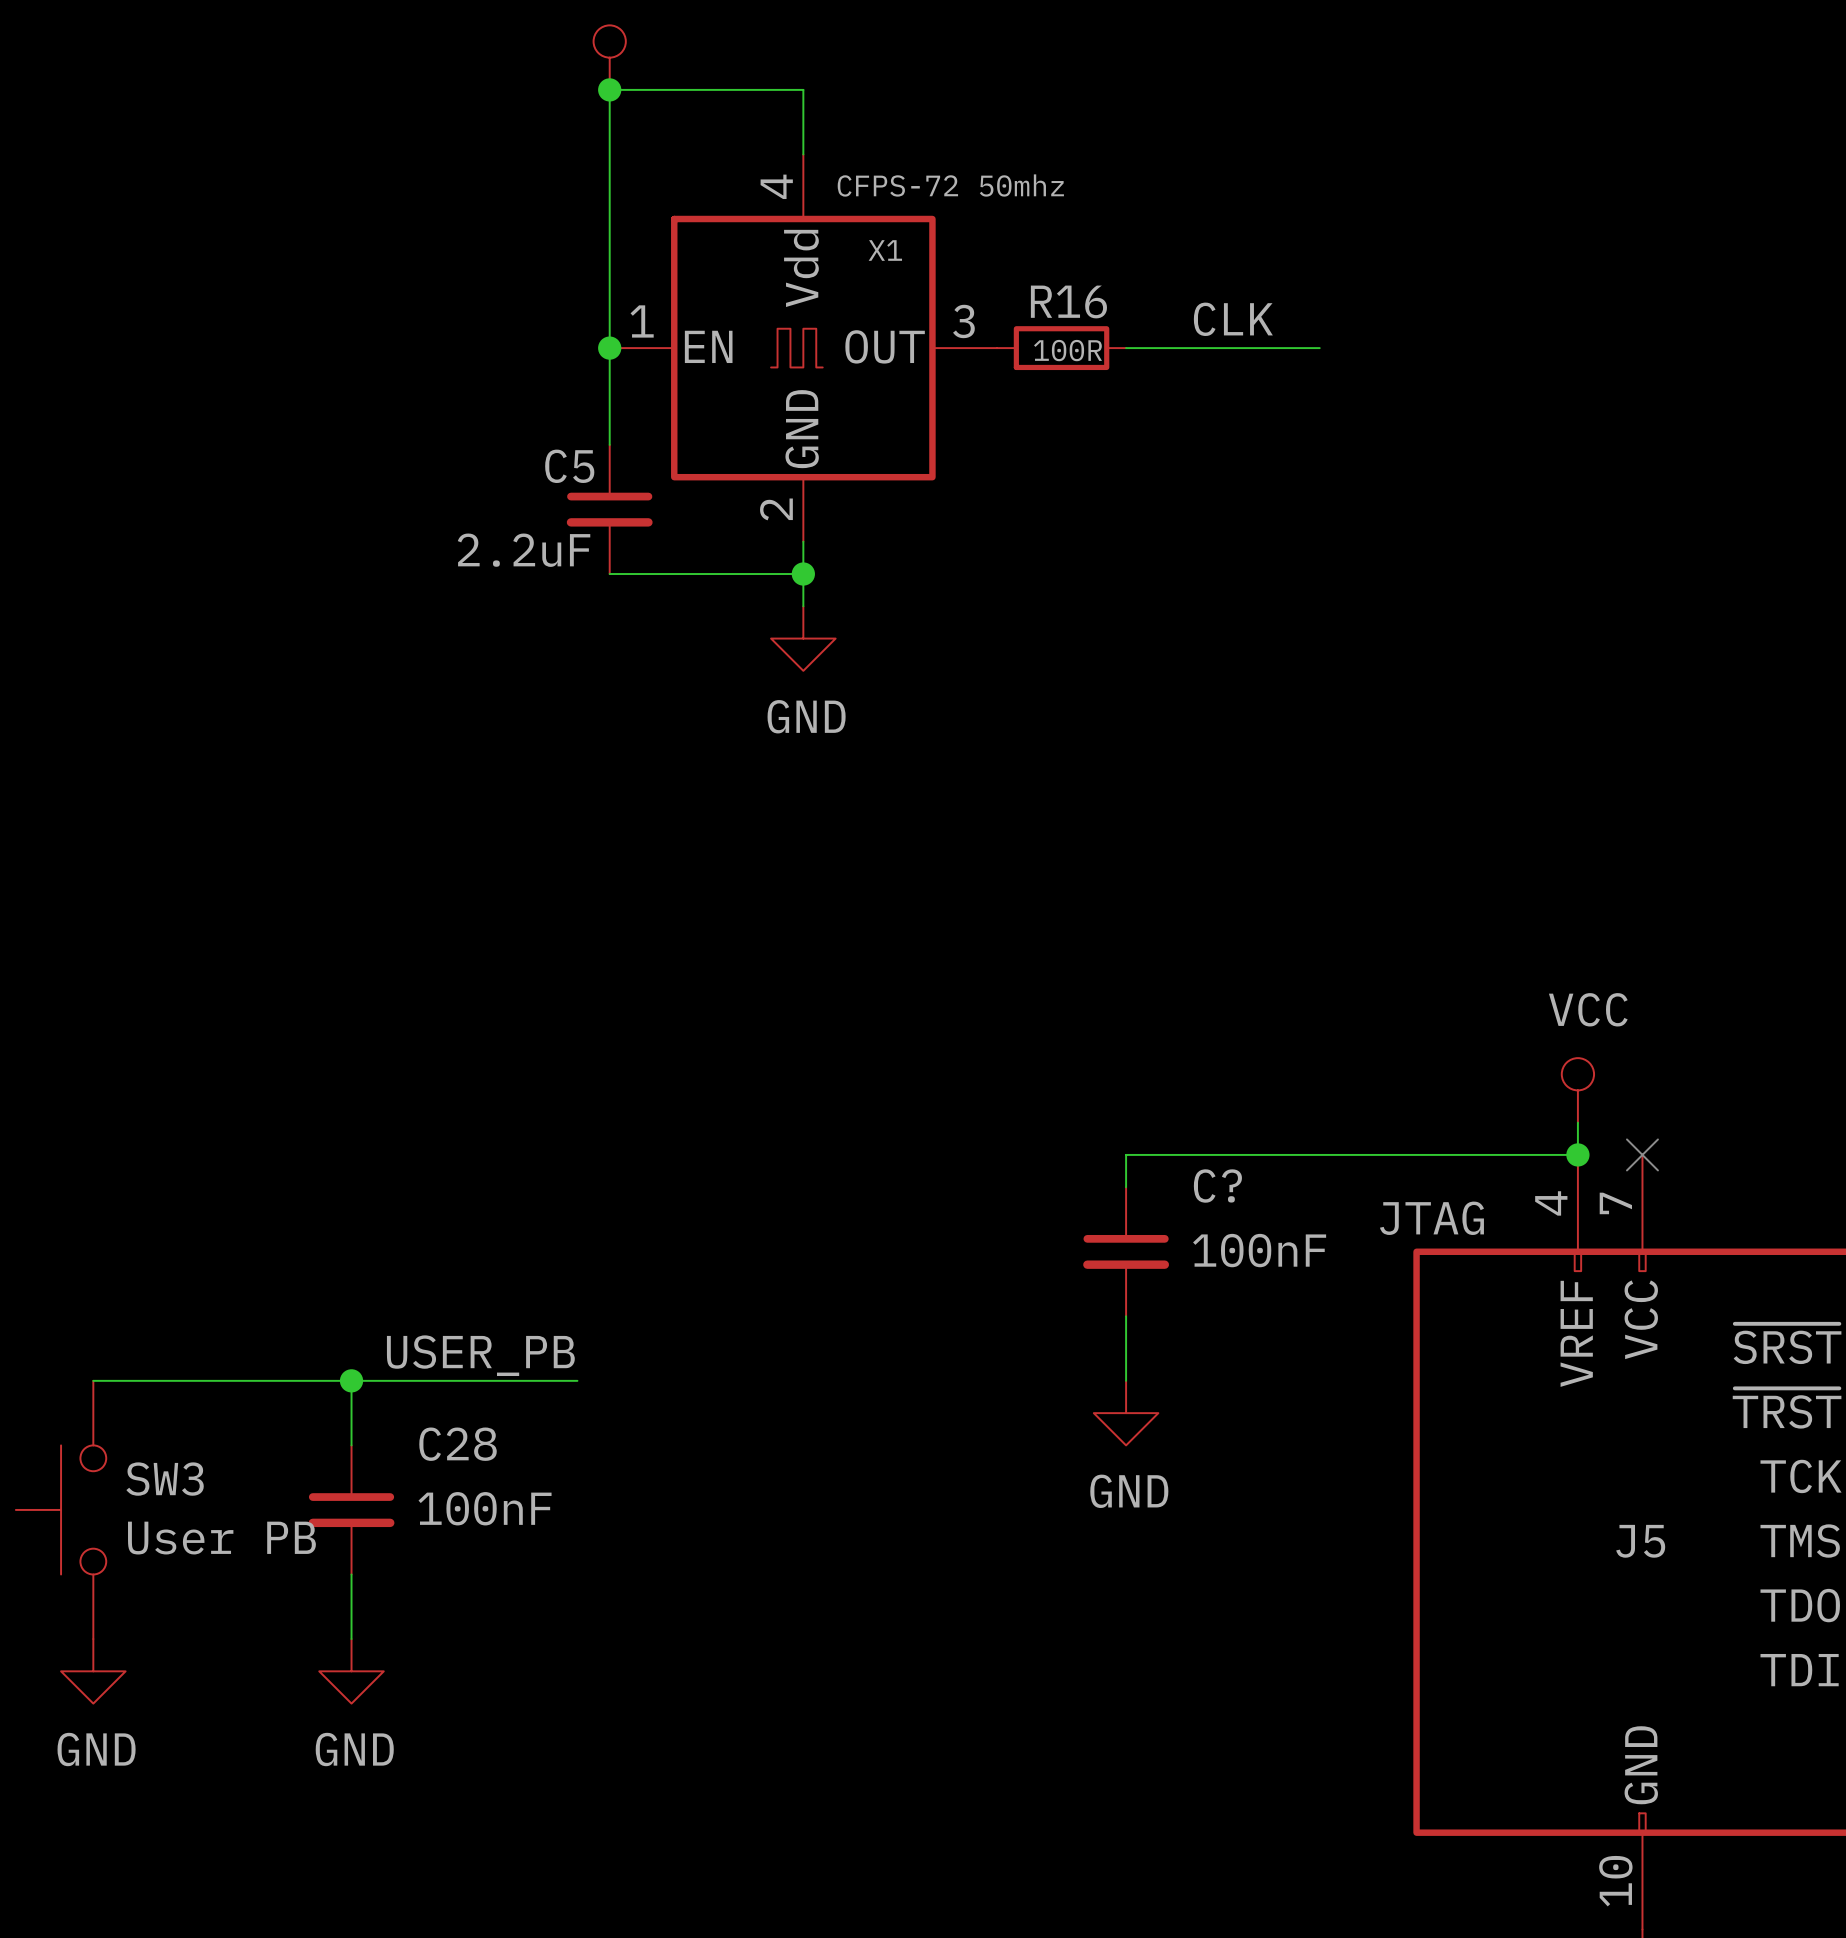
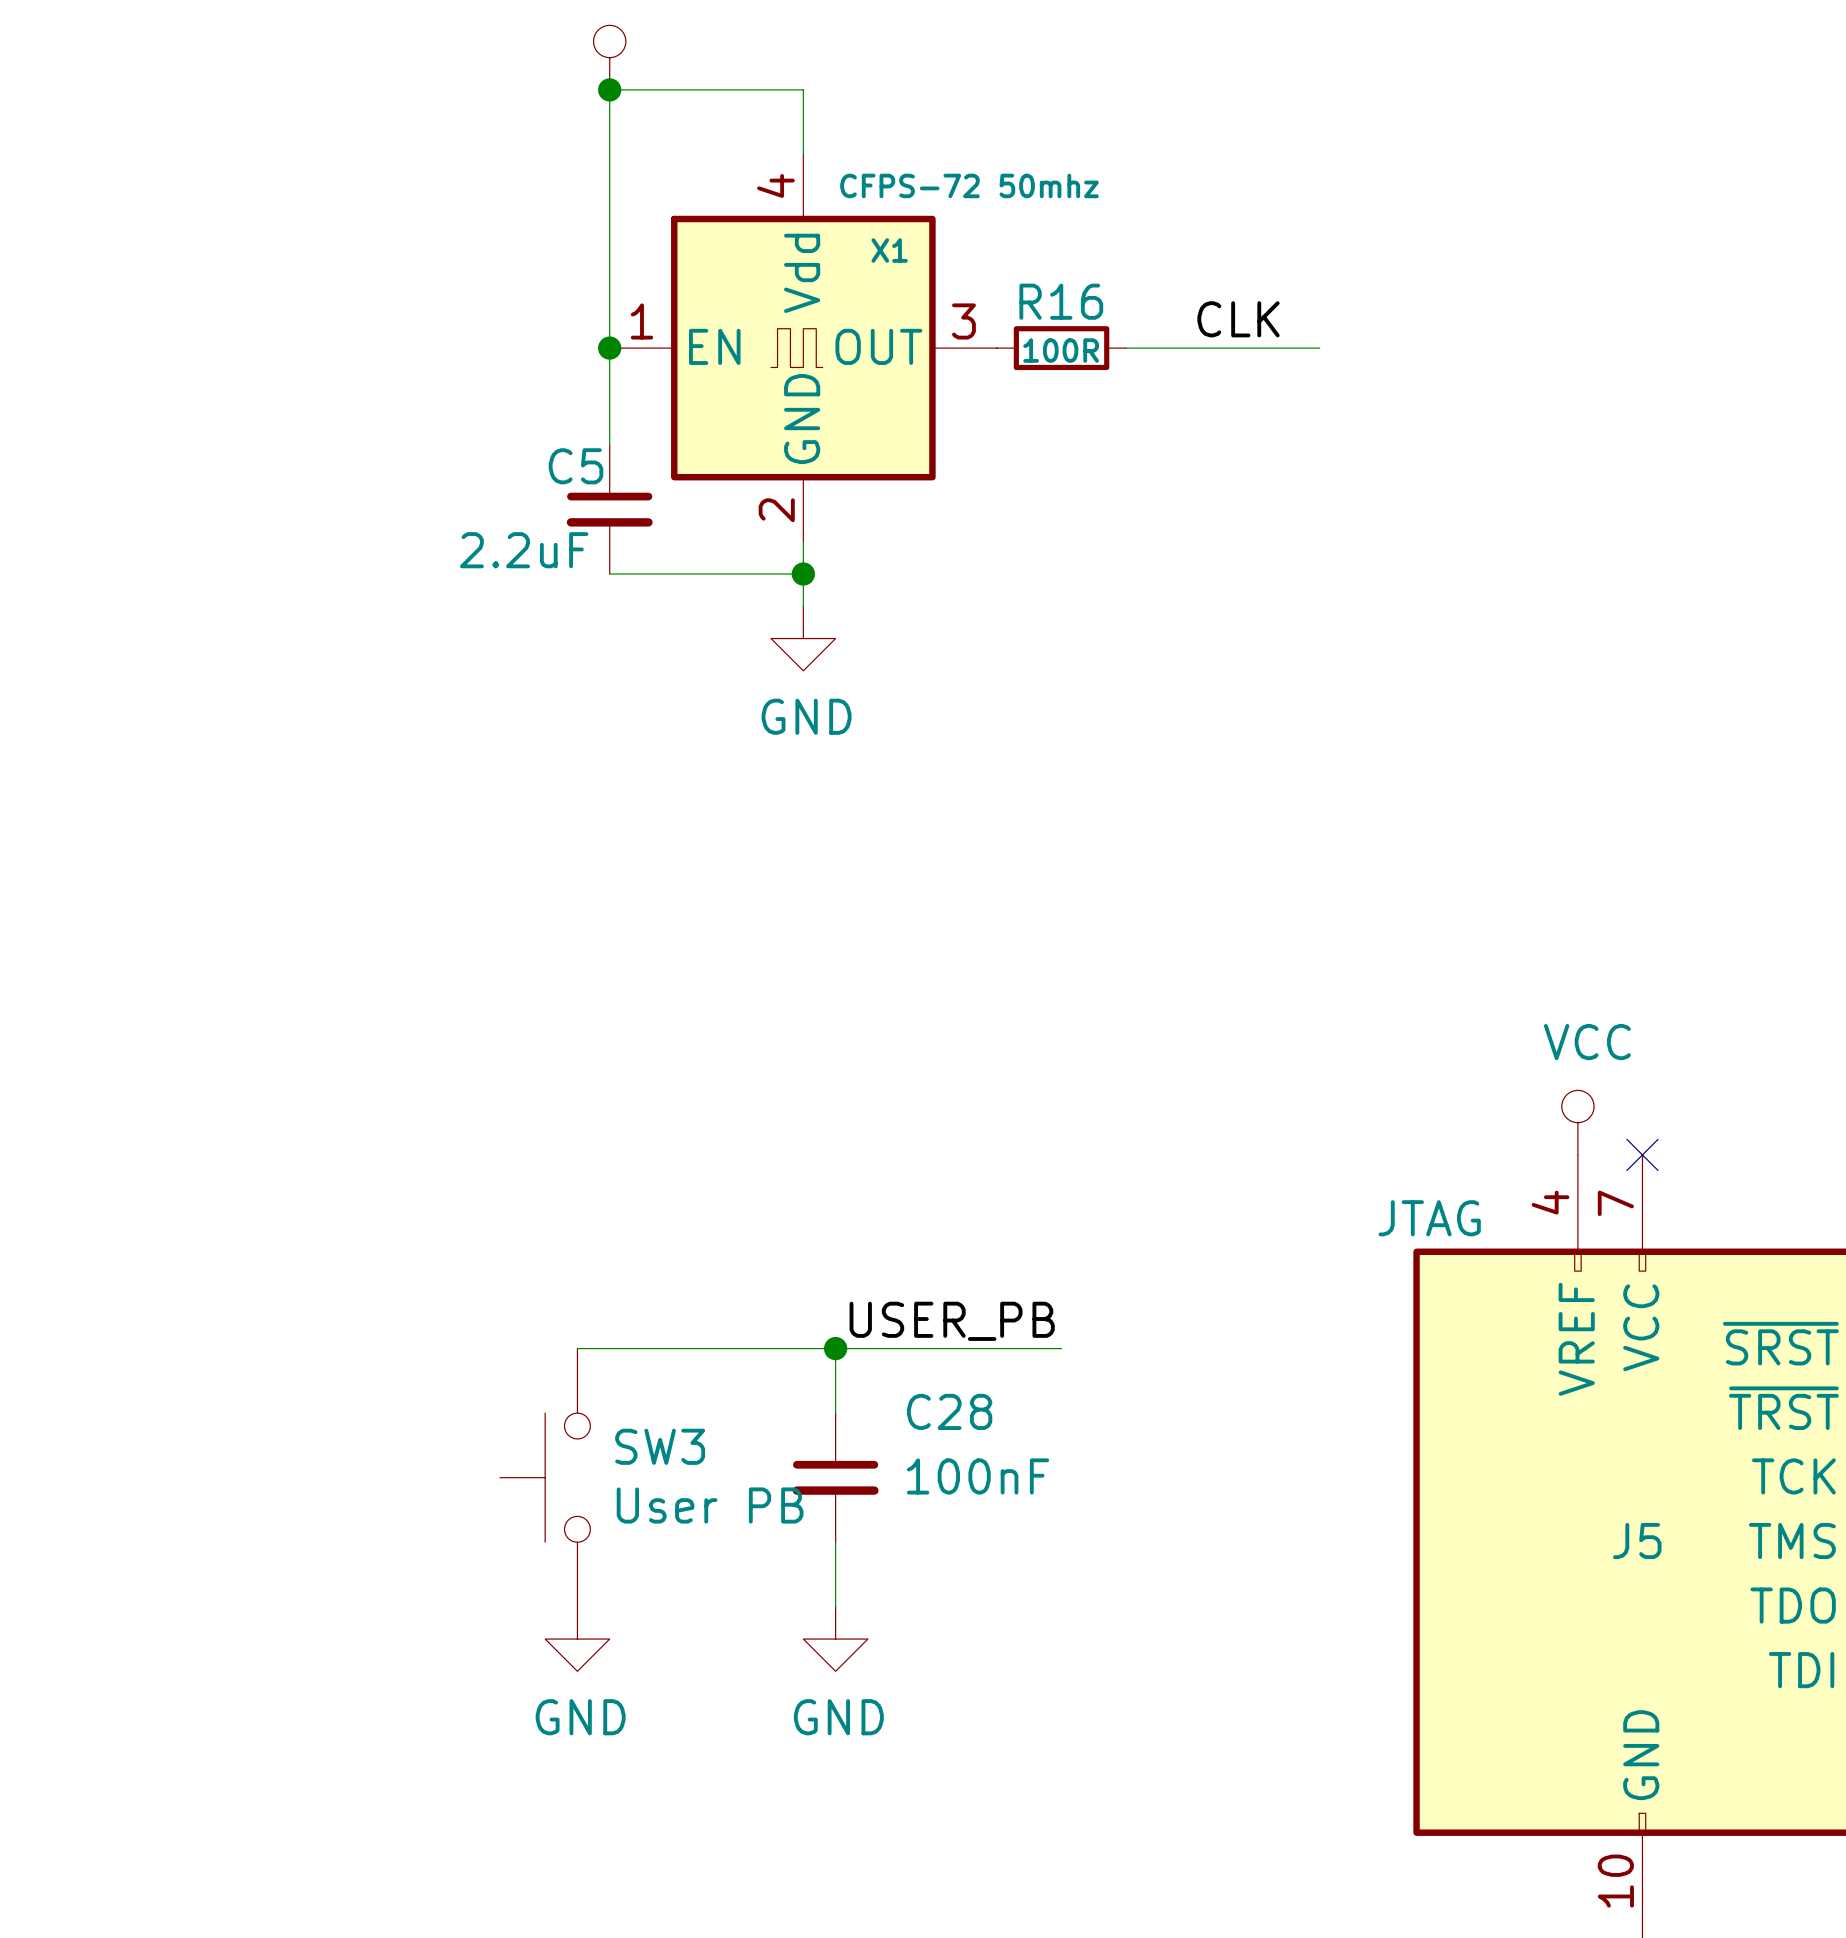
power symbol position: VCC (1577, 1090) -> VCC (1577, 1122)
wire: (1577, 1122) (1577, 1154) (1126, 1154) (1126, 1187) -> none
junction: (1577, 1154) -> none
C?: 100nF (1126, 1251) -> none
wire: (1126, 1316) (1126, 1380) -> none
junction: none -> (835, 1348)
label position: USER_PB (480, 1355) -> USER_PB (952, 1321)
wire: (93, 1380) (577, 1380) -> (577, 1348) (1061, 1348)
wire: (351, 1380) (351, 1445) -> (835, 1348) (835, 1413)
junction: (351, 1380) -> none
power symbol: GND (1126, 1413) -> none
SW3 position: (61, 1509) -> (545, 1477)
C28 position: (351, 1509) -> (835, 1477)
wire: (351, 1574) (351, 1639) -> (835, 1542) (835, 1606)
power symbol: none -> GND (835, 1639)
power symbol: GND (93, 1671) -> none
power symbol position: GND (351, 1671) -> GND (577, 1639)

